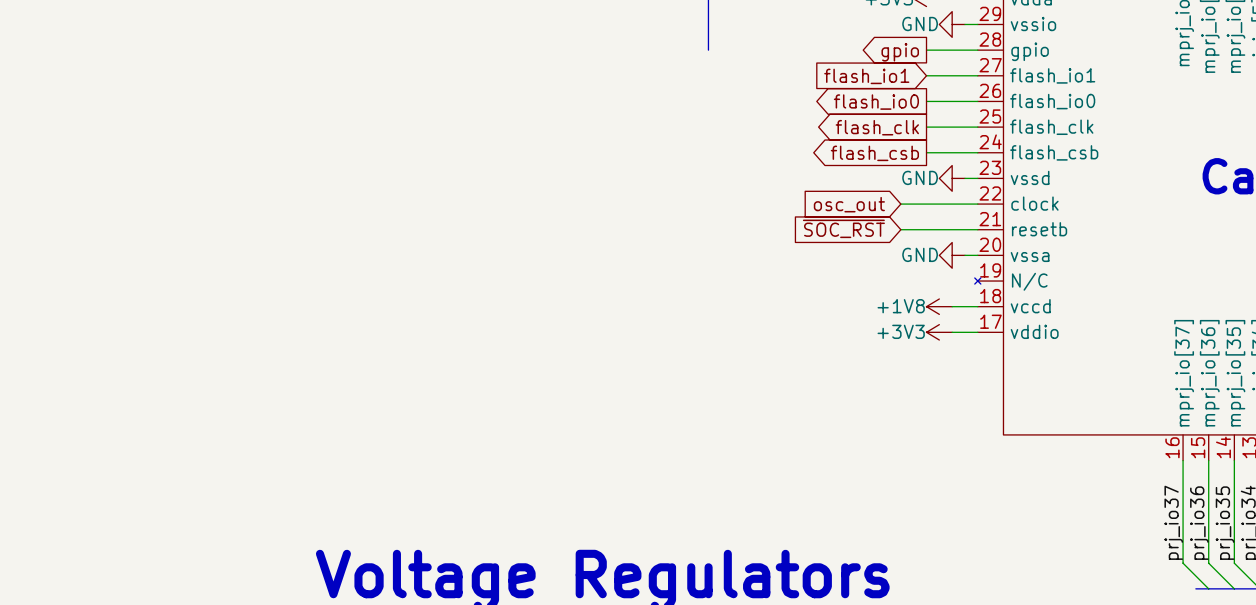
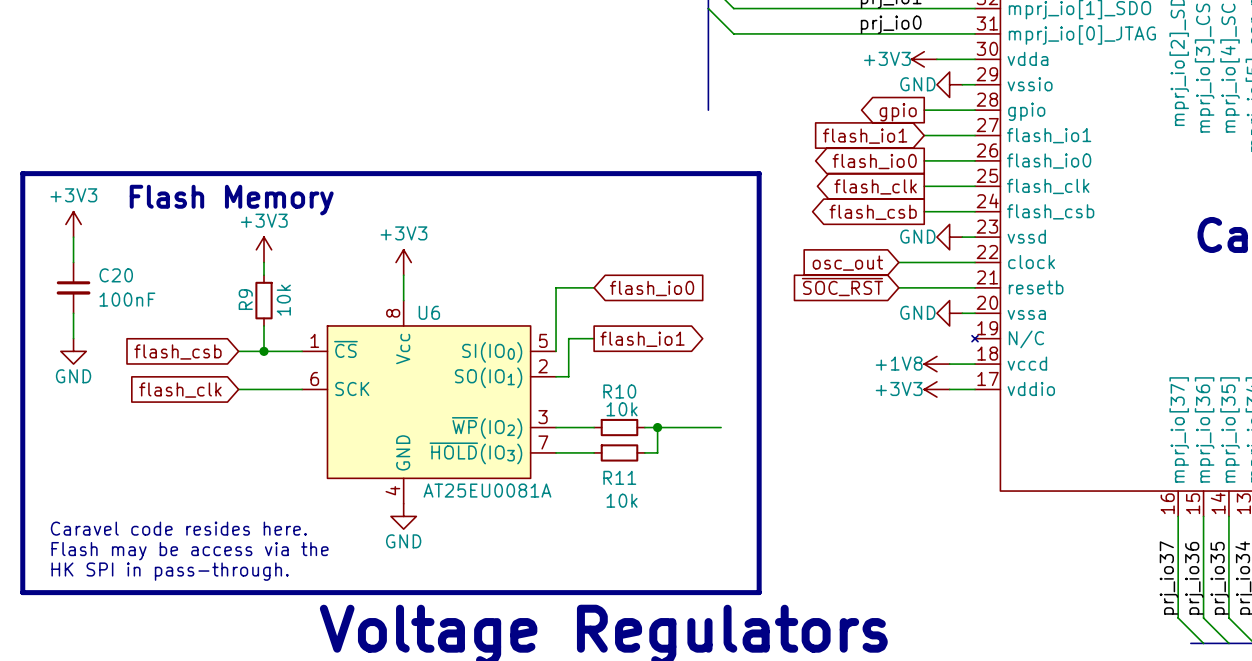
line: none -> (22, 173) (759, 173) (759, 592) (22, 592) (22, 173)
text: none -> Flash Memory (231, 200)
power symbol: none -> +3V3 (73, 224)
wire: none -> (73, 237) (73, 262)
power symbol: none -> +3V3 (264, 249)
wire: none -> (264, 262) (264, 275)
power symbol: none -> +3V3 (403, 262)
wire: none -> (403, 275) (403, 300)
C20: none -> 100nF (73, 287)
wire: none -> (594, 287) (556, 287) (556, 351)
global label: none -> flash_io0 (652, 288)
R9: none -> 10k (264, 300)
wire: none -> (73, 313) (73, 338)
wire: none -> (264, 325) (264, 351)
wire: none -> (594, 338) (568, 338) (568, 376) (556, 376)
global label: none -> flash_io1 (642, 339)
power symbol: none -> GND (73, 351)
wire: none -> (238, 351) (302, 351)
junction: none -> (264, 351)
global label: none -> flash_csb (177, 351)
global label: none -> flash_clk (180, 390)
wire: none -> (238, 389) (302, 389)
U6: none -> AT25EU0081A (429, 402)
wire: none -> (556, 427) (594, 427)
R10: none -> 10k (619, 427)
wire: none -> (644, 427) (721, 427)
wire: none -> (657, 427) (657, 452) (644, 452)
junction: none -> (657, 427)
wire: none -> (556, 452) (594, 452)
R11: none -> 10k (619, 452)
power symbol: none -> GND (403, 516)
text: none -> Caravel code resides here. (178, 528)
text: none -> Flash may be access via the (190, 551)
text: none -> HK SPI in pass-through. (170, 571)

